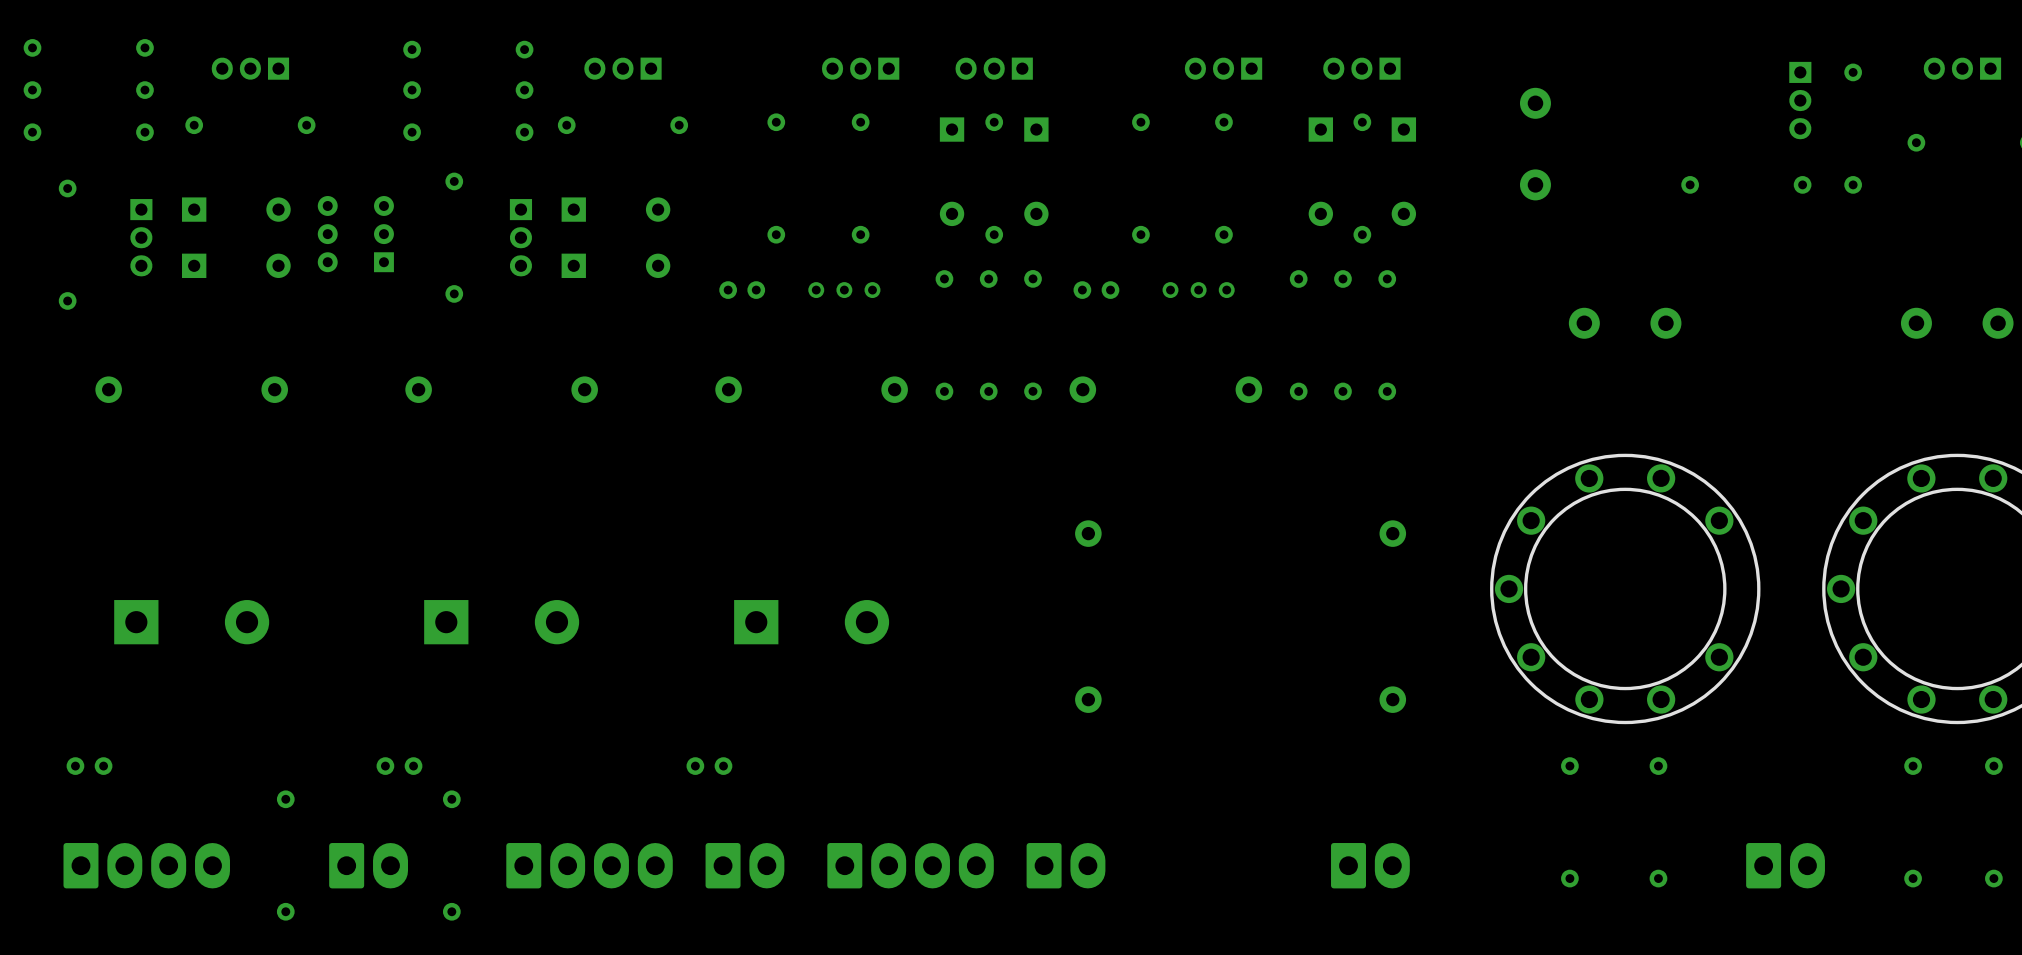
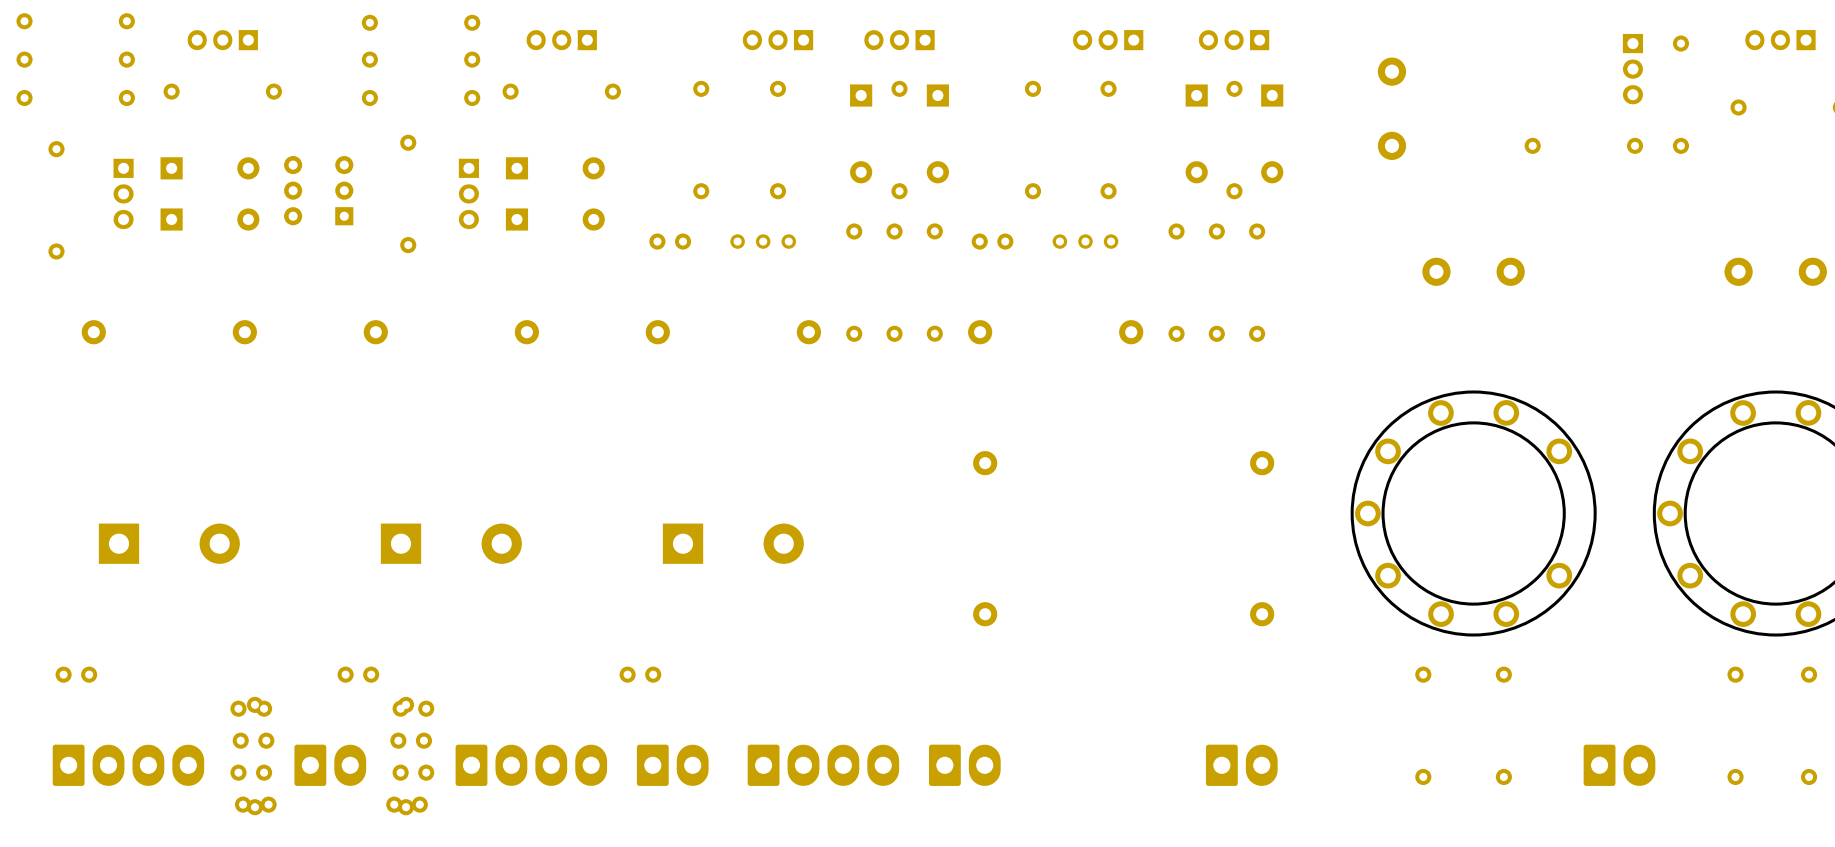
part: none -> (251, 708)
part: none -> (413, 708)
part: none -> (253, 740)
part: none -> (411, 740)
part: none -> (251, 772)
part: none -> (413, 772)
part: none -> (255, 804)
part: none -> (407, 804)

